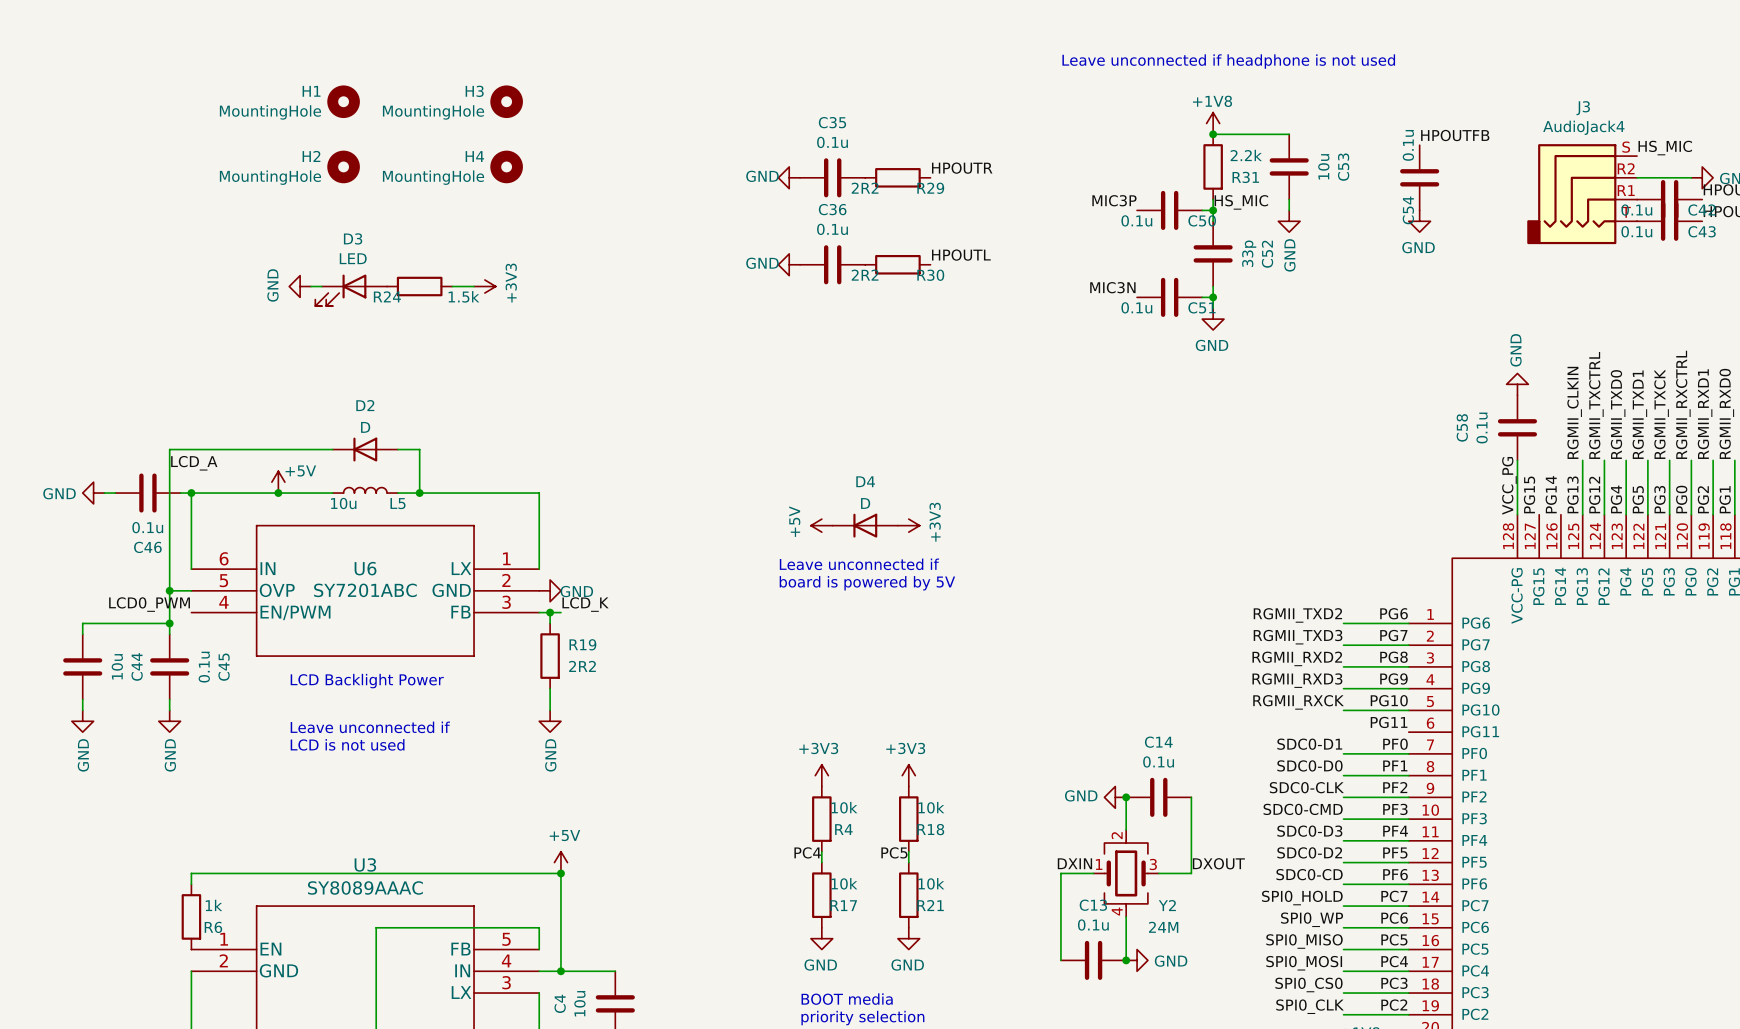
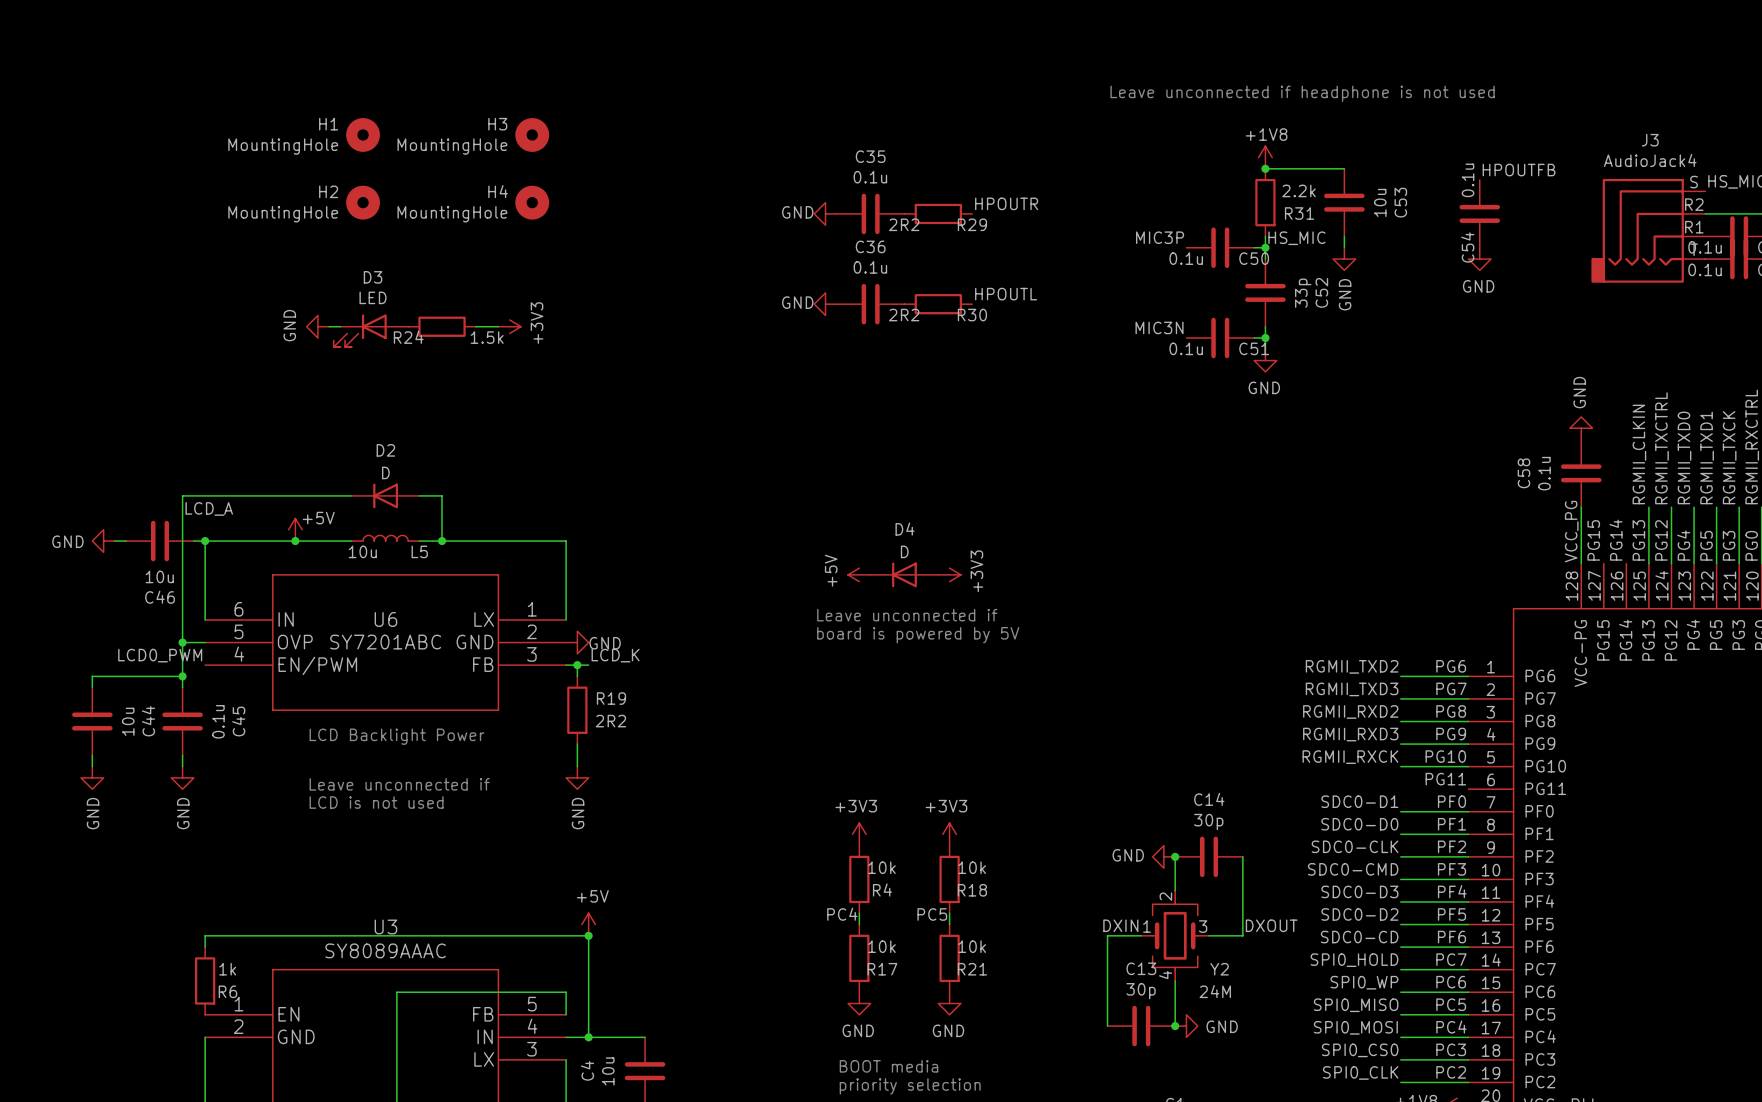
C46 value: 0.1u (147, 527) -> 10u (159, 576)
C14 value: 0.1u (1158, 761) -> 30p (1208, 822)
C13 value: 0.1u (1093, 925) -> 30p (1141, 991)

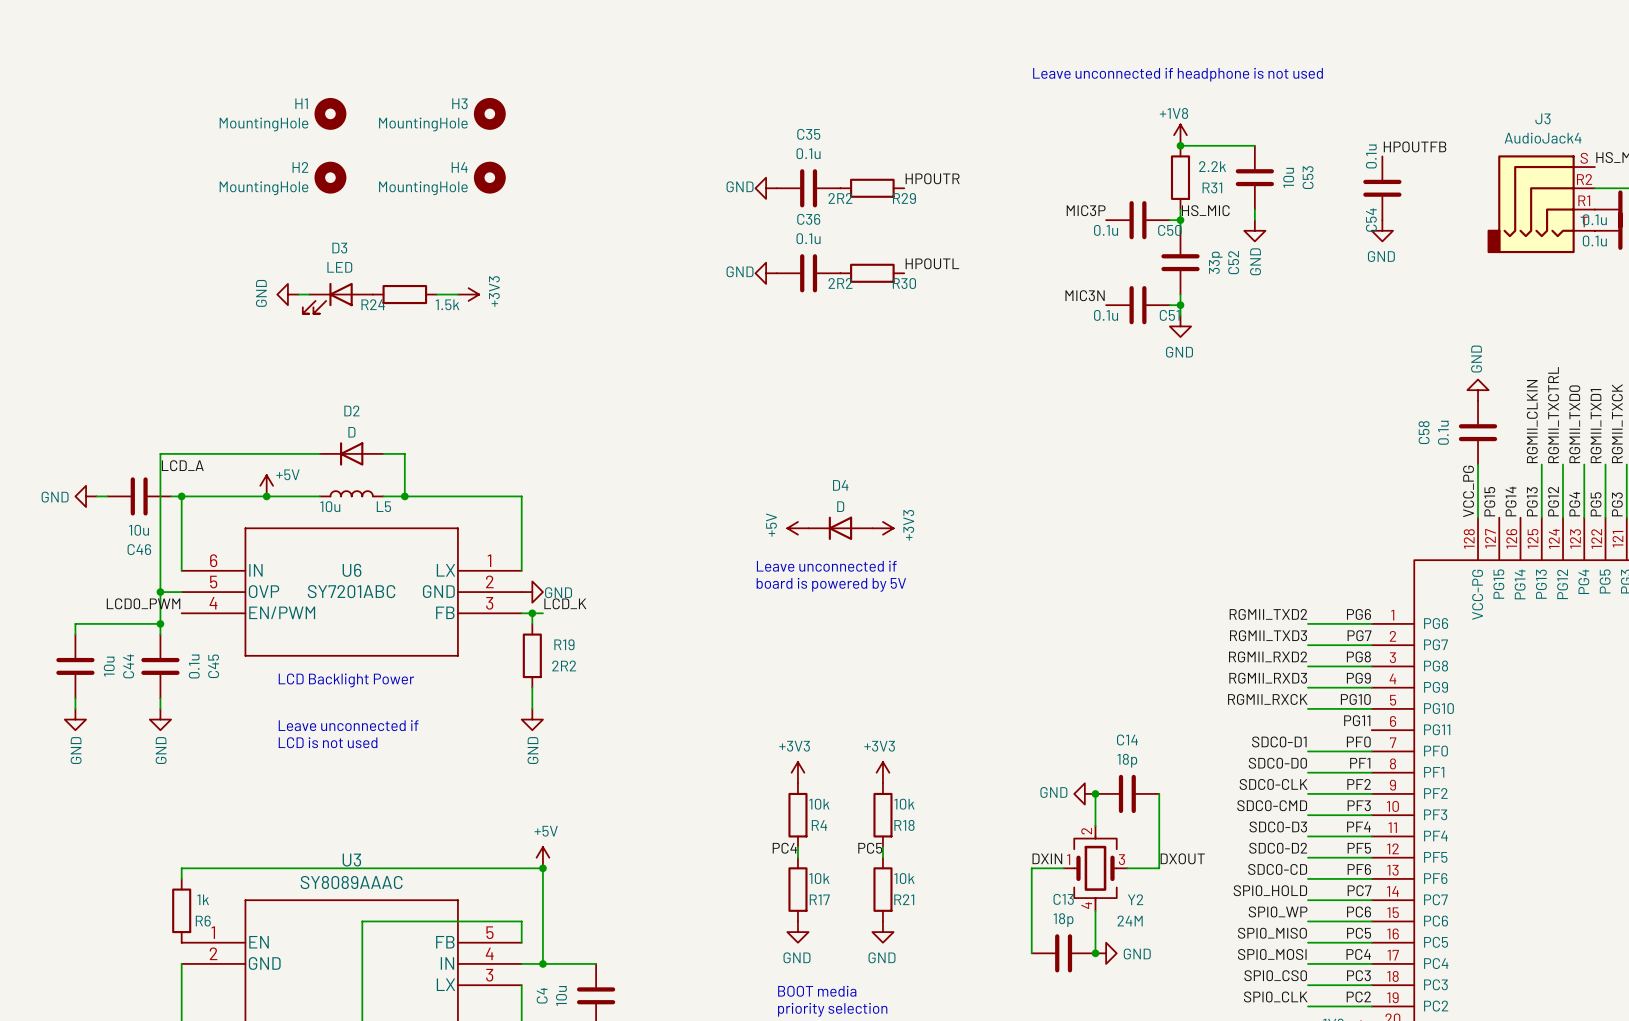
C14 value: 30p (1208, 822) -> 18p (1127, 760)
C13 value: 30p (1141, 991) -> 18p (1063, 920)

